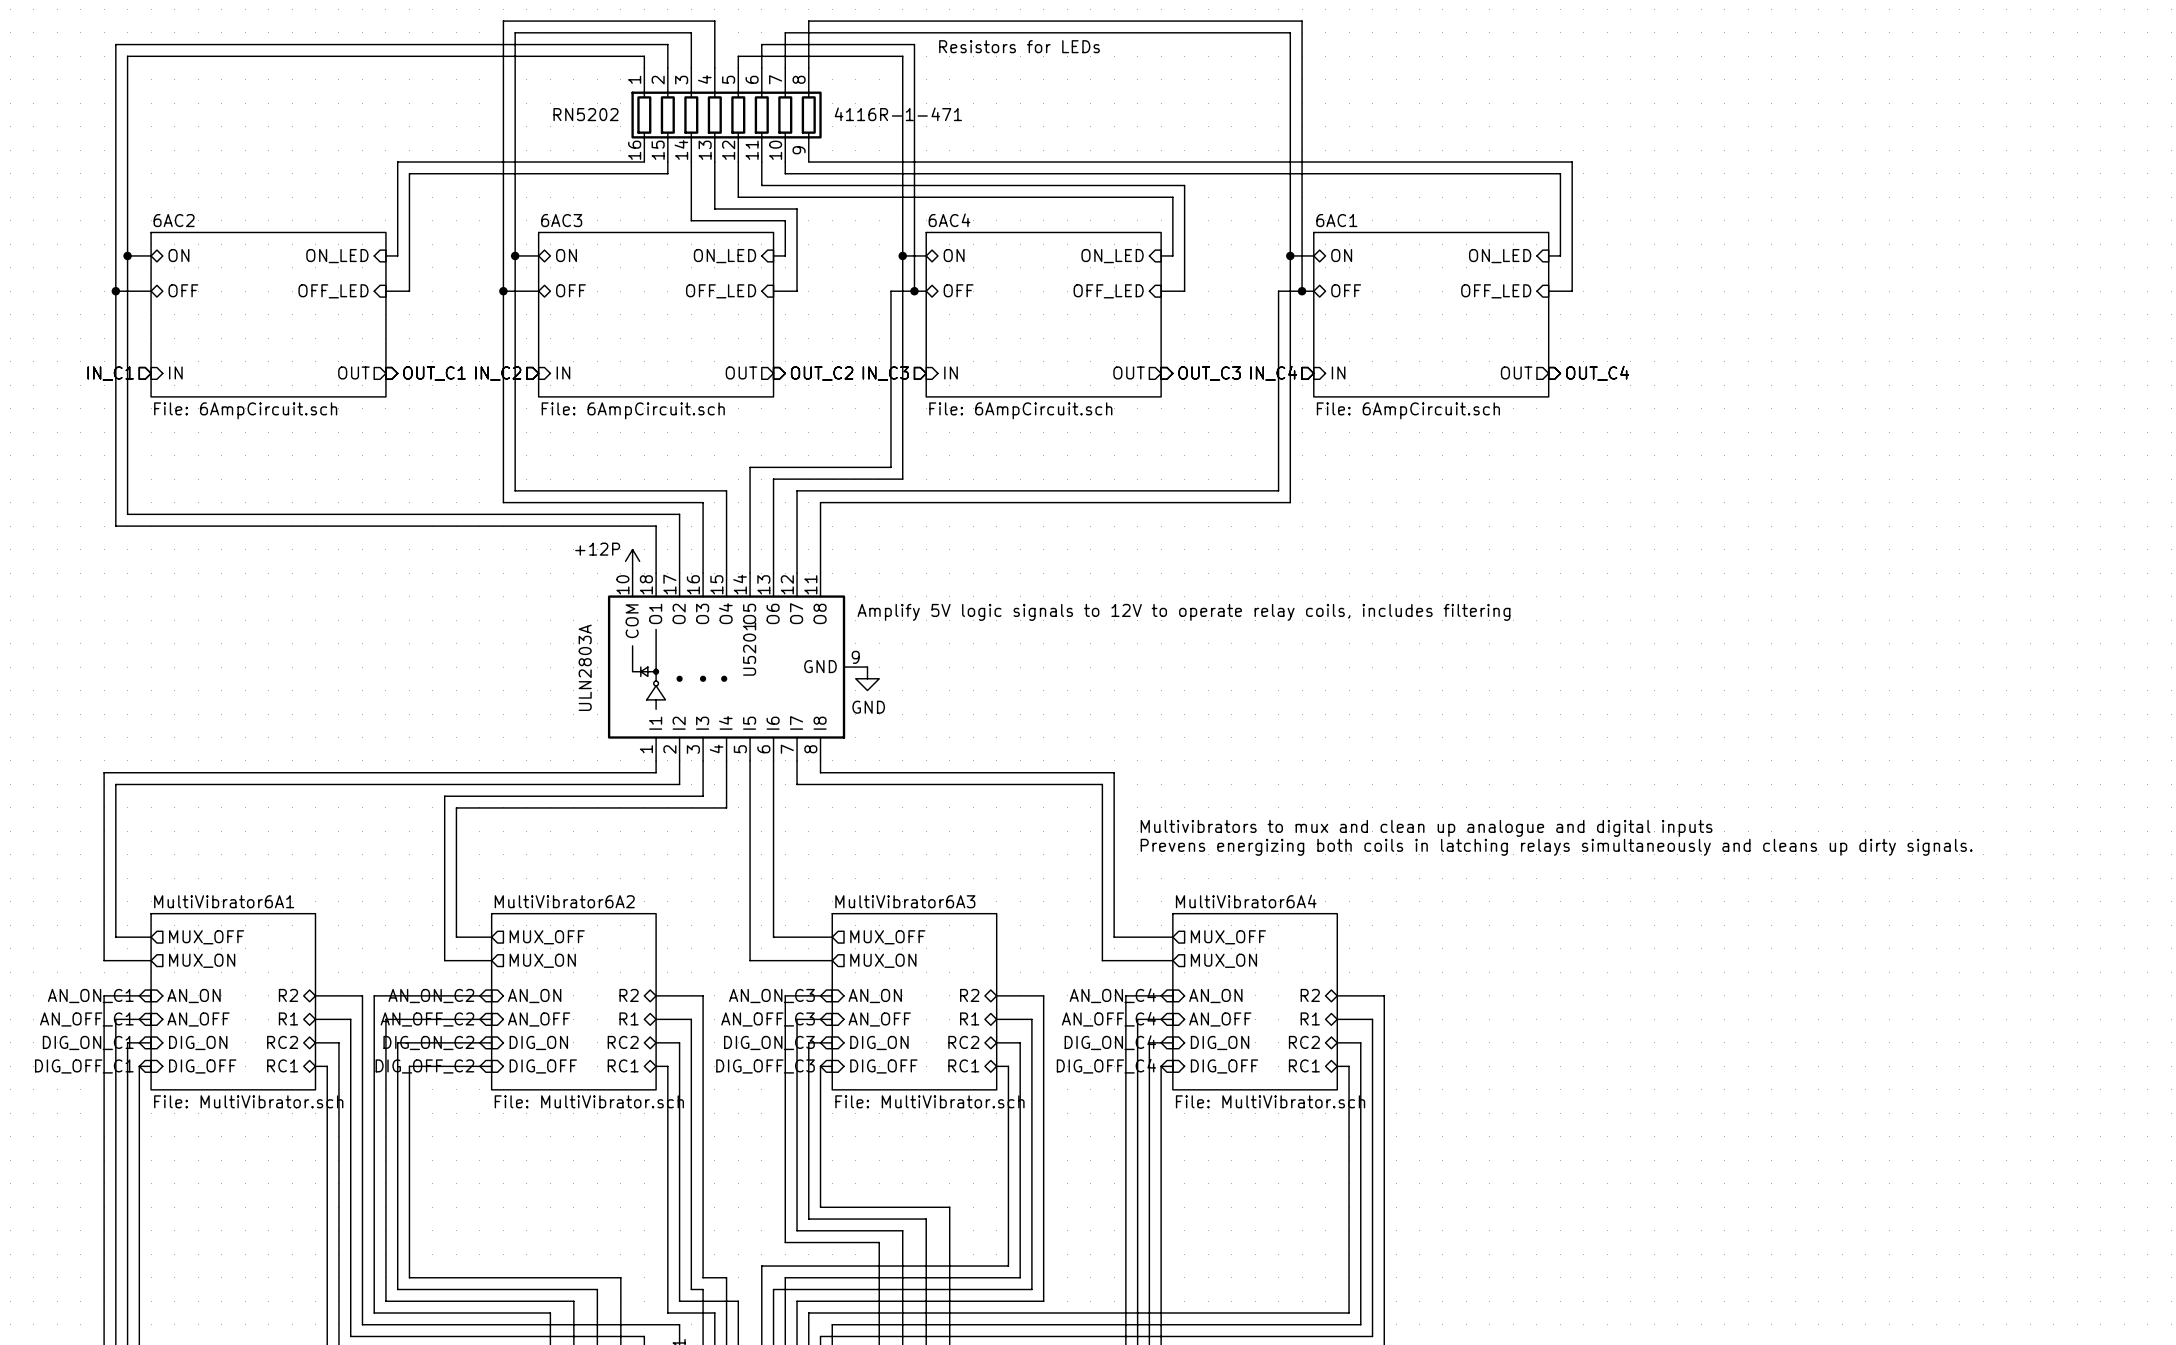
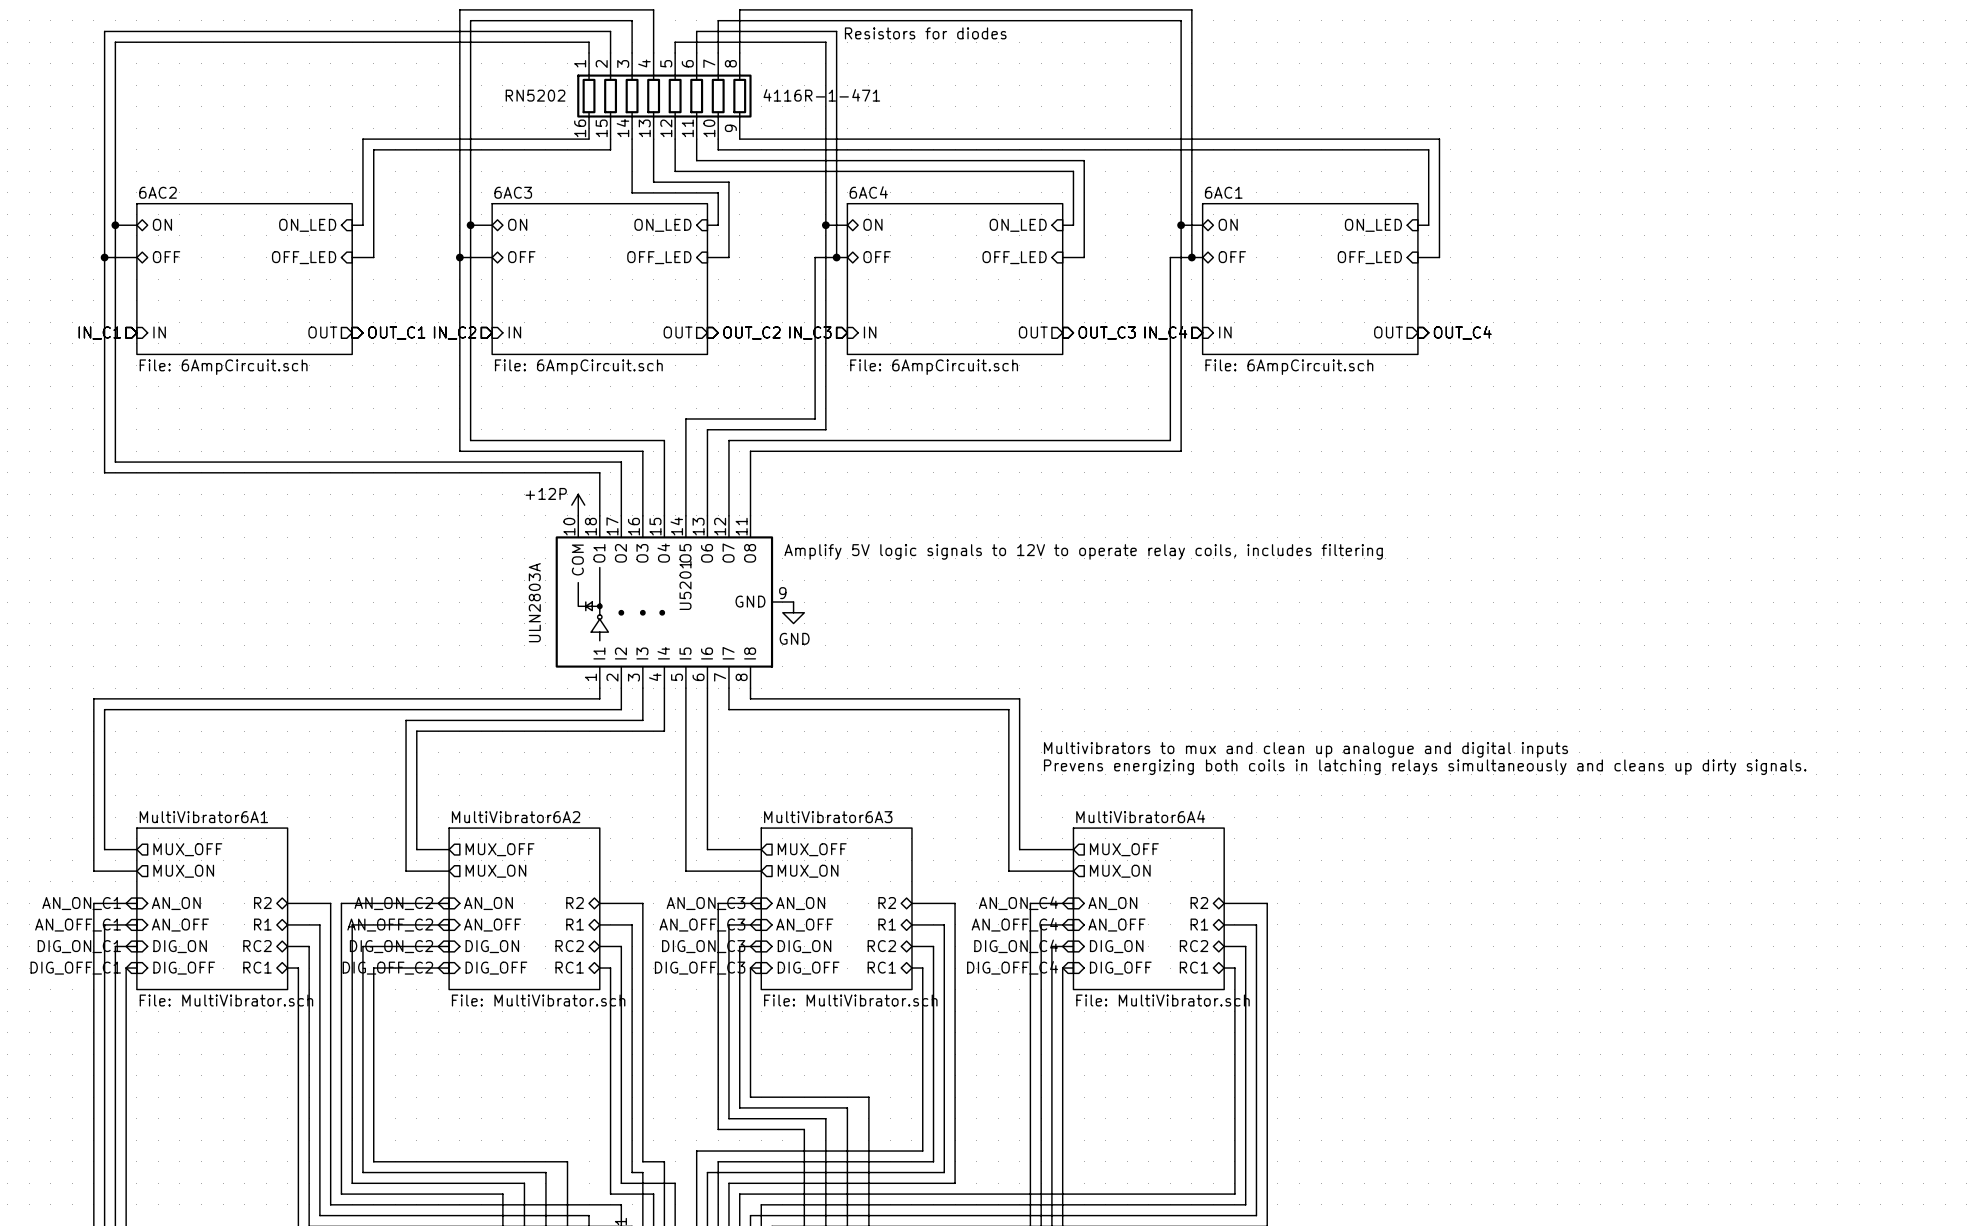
text: Resistors for LEDs (1019, 46) -> Resistors for diodes (925, 33)

